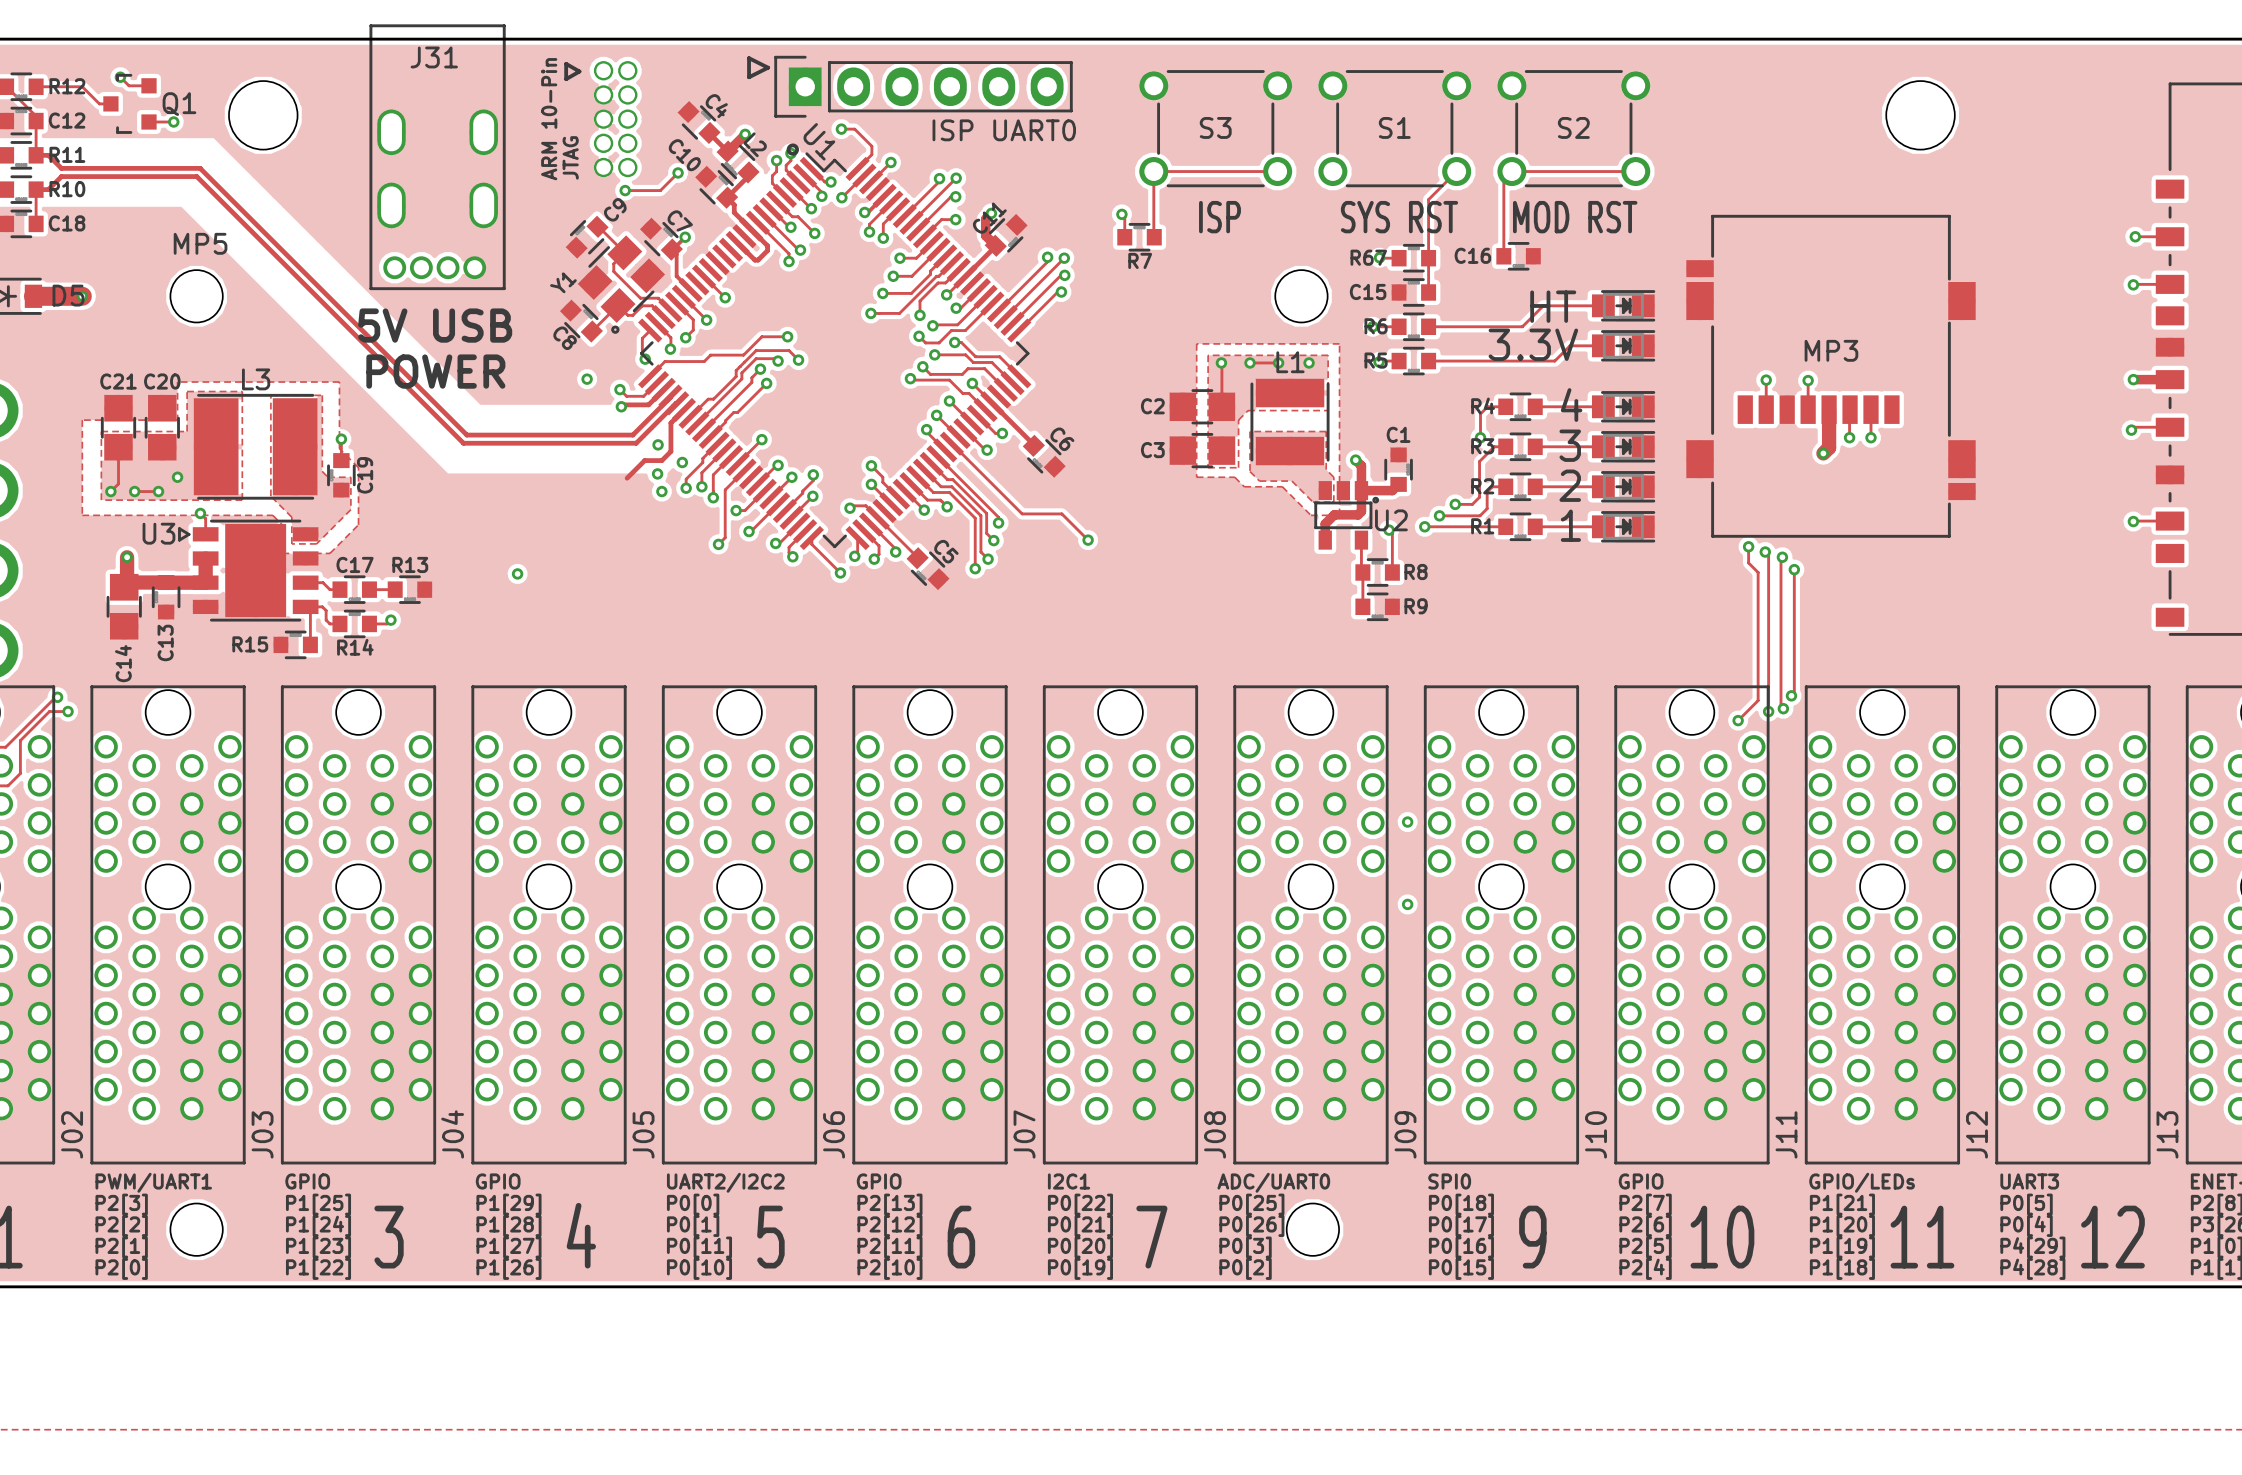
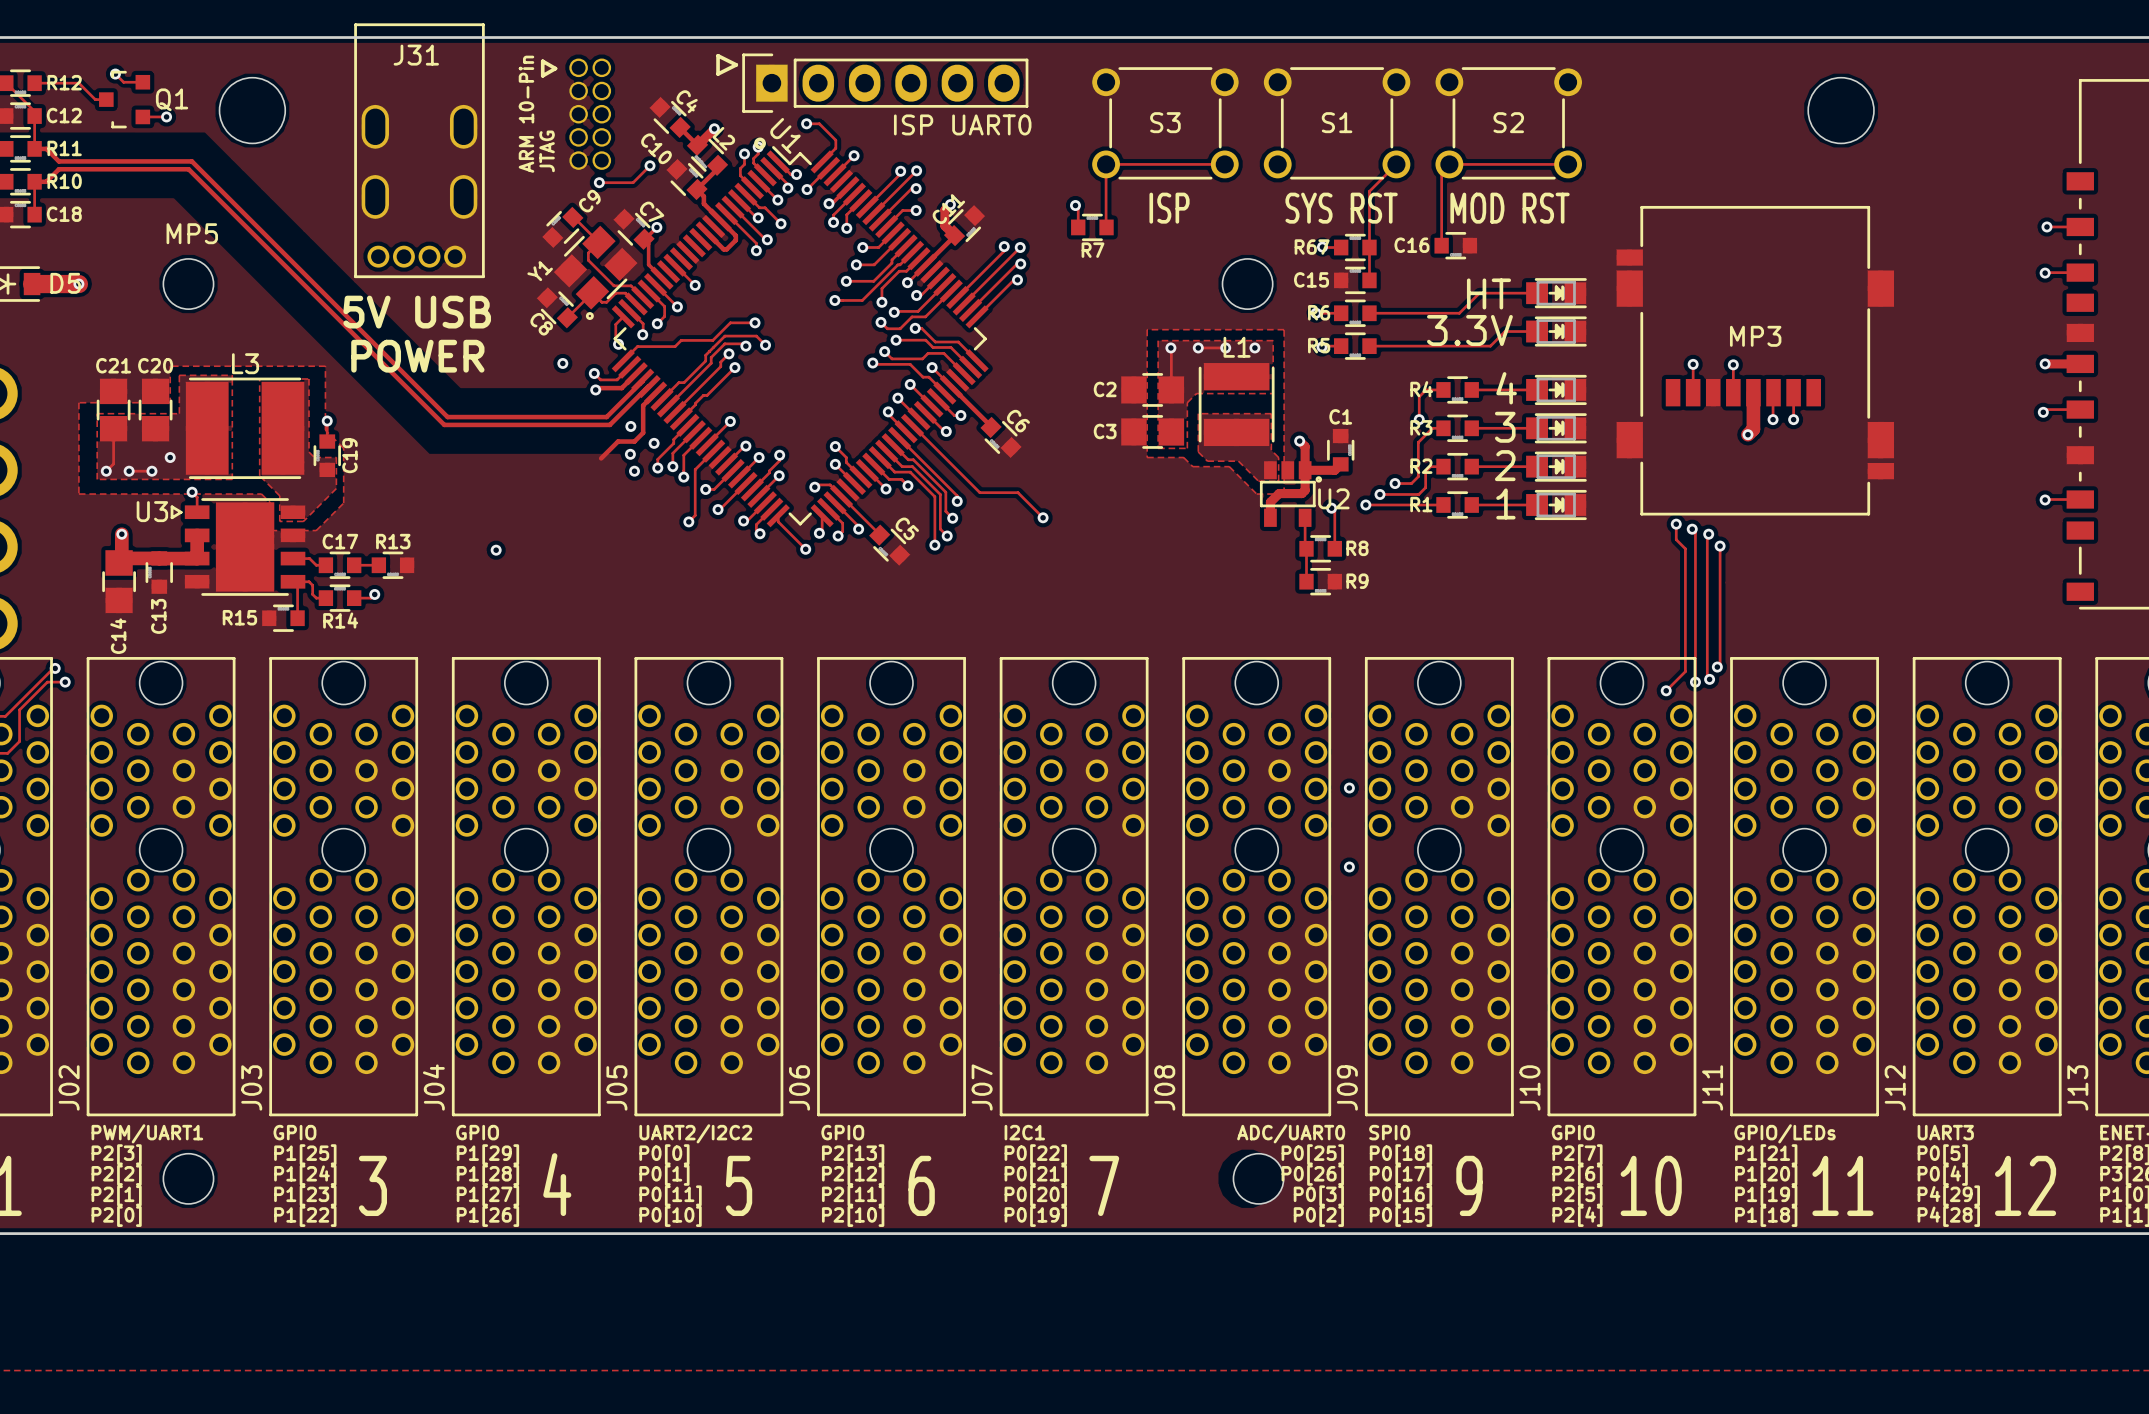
text position: ADC/UART0 (1273, 1182) -> ADC/UART0 (1291, 1133)
text position: P0[25] (1251, 1204) -> P0[25] (1312, 1154)
text position: P0[26] (1251, 1226) -> P0[26] (1312, 1175)
text position: P0[3] (1245, 1247) -> P0[3] (1318, 1195)
text position: P0[2] (1245, 1268) -> P0[2] (1318, 1216)

